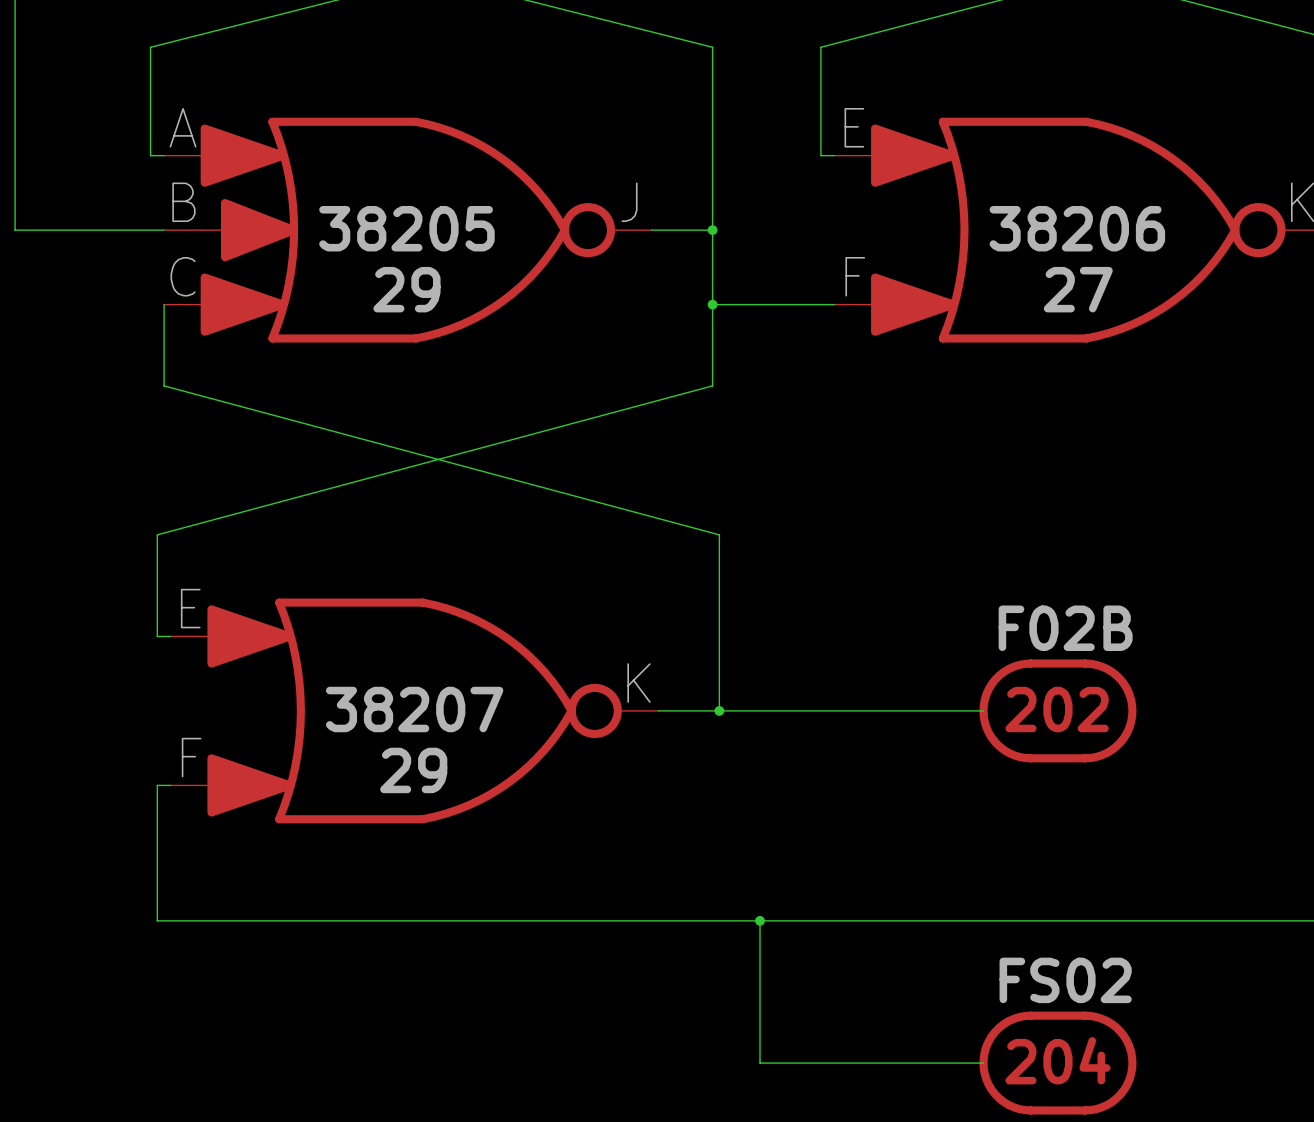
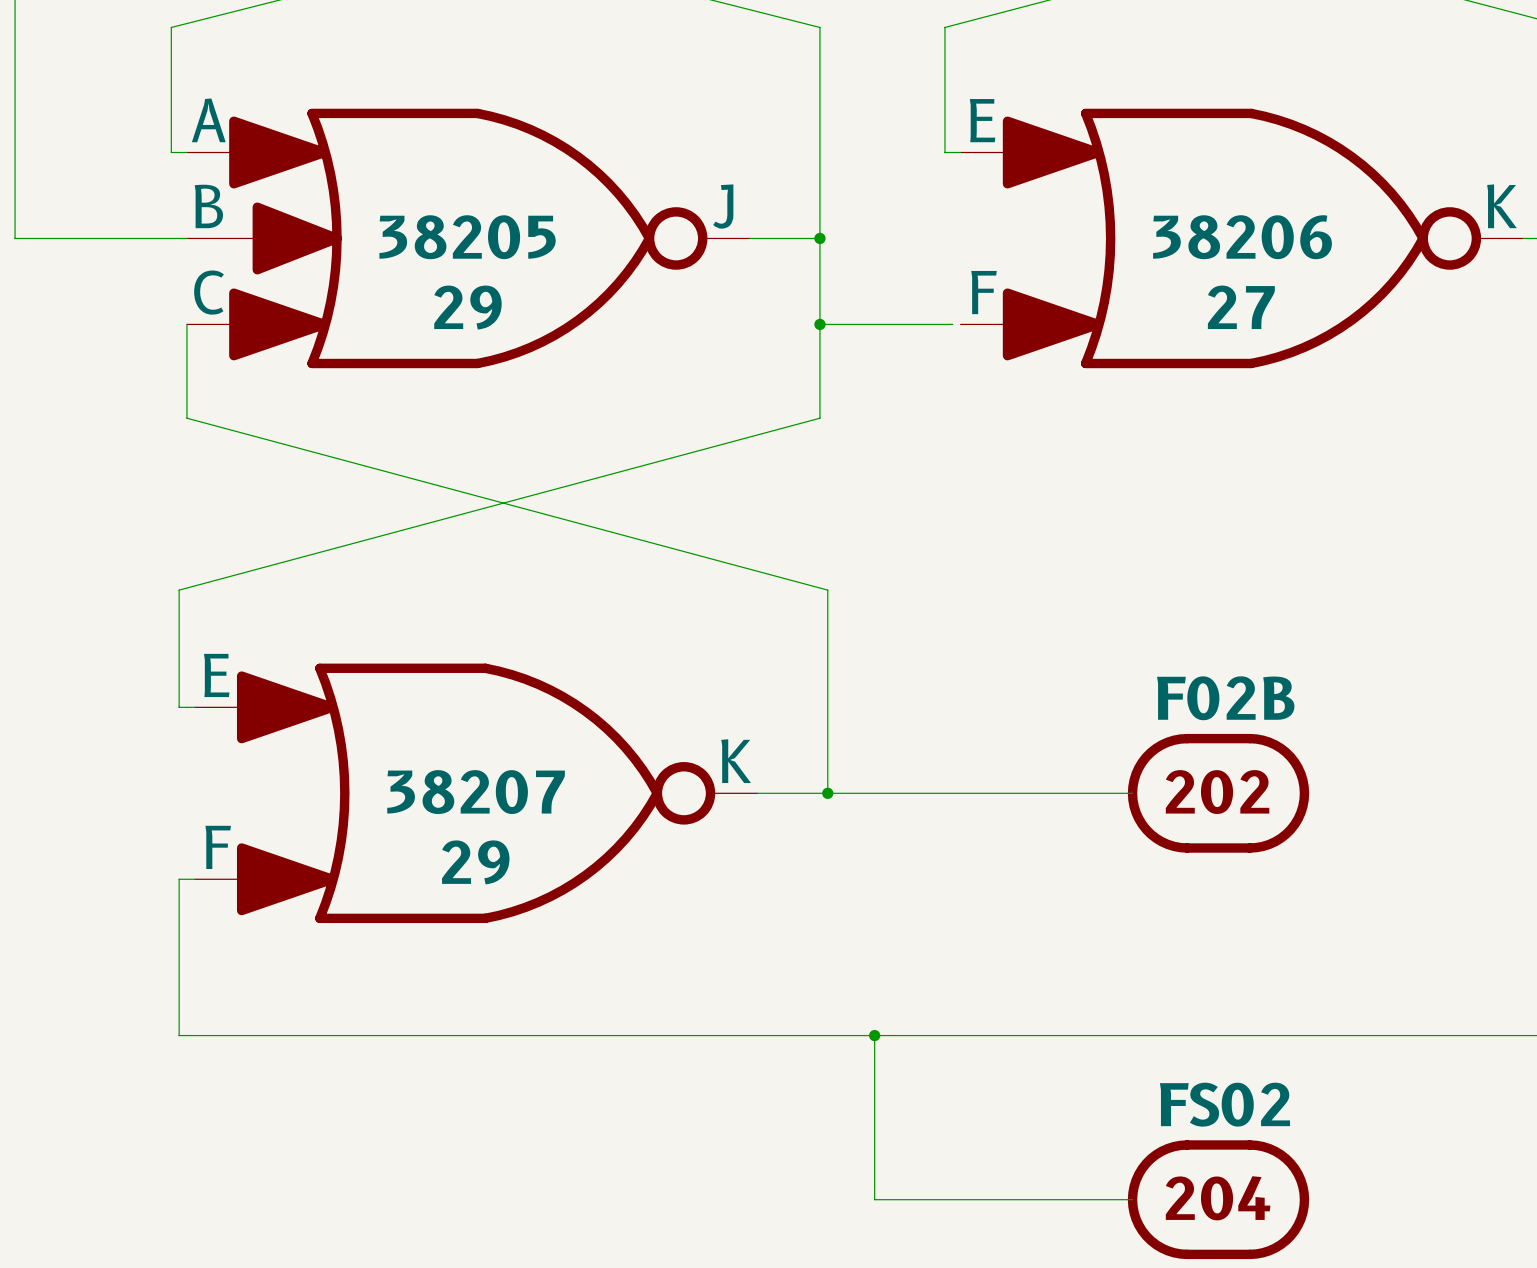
wire: (827, 304) (834, 304) -> none

